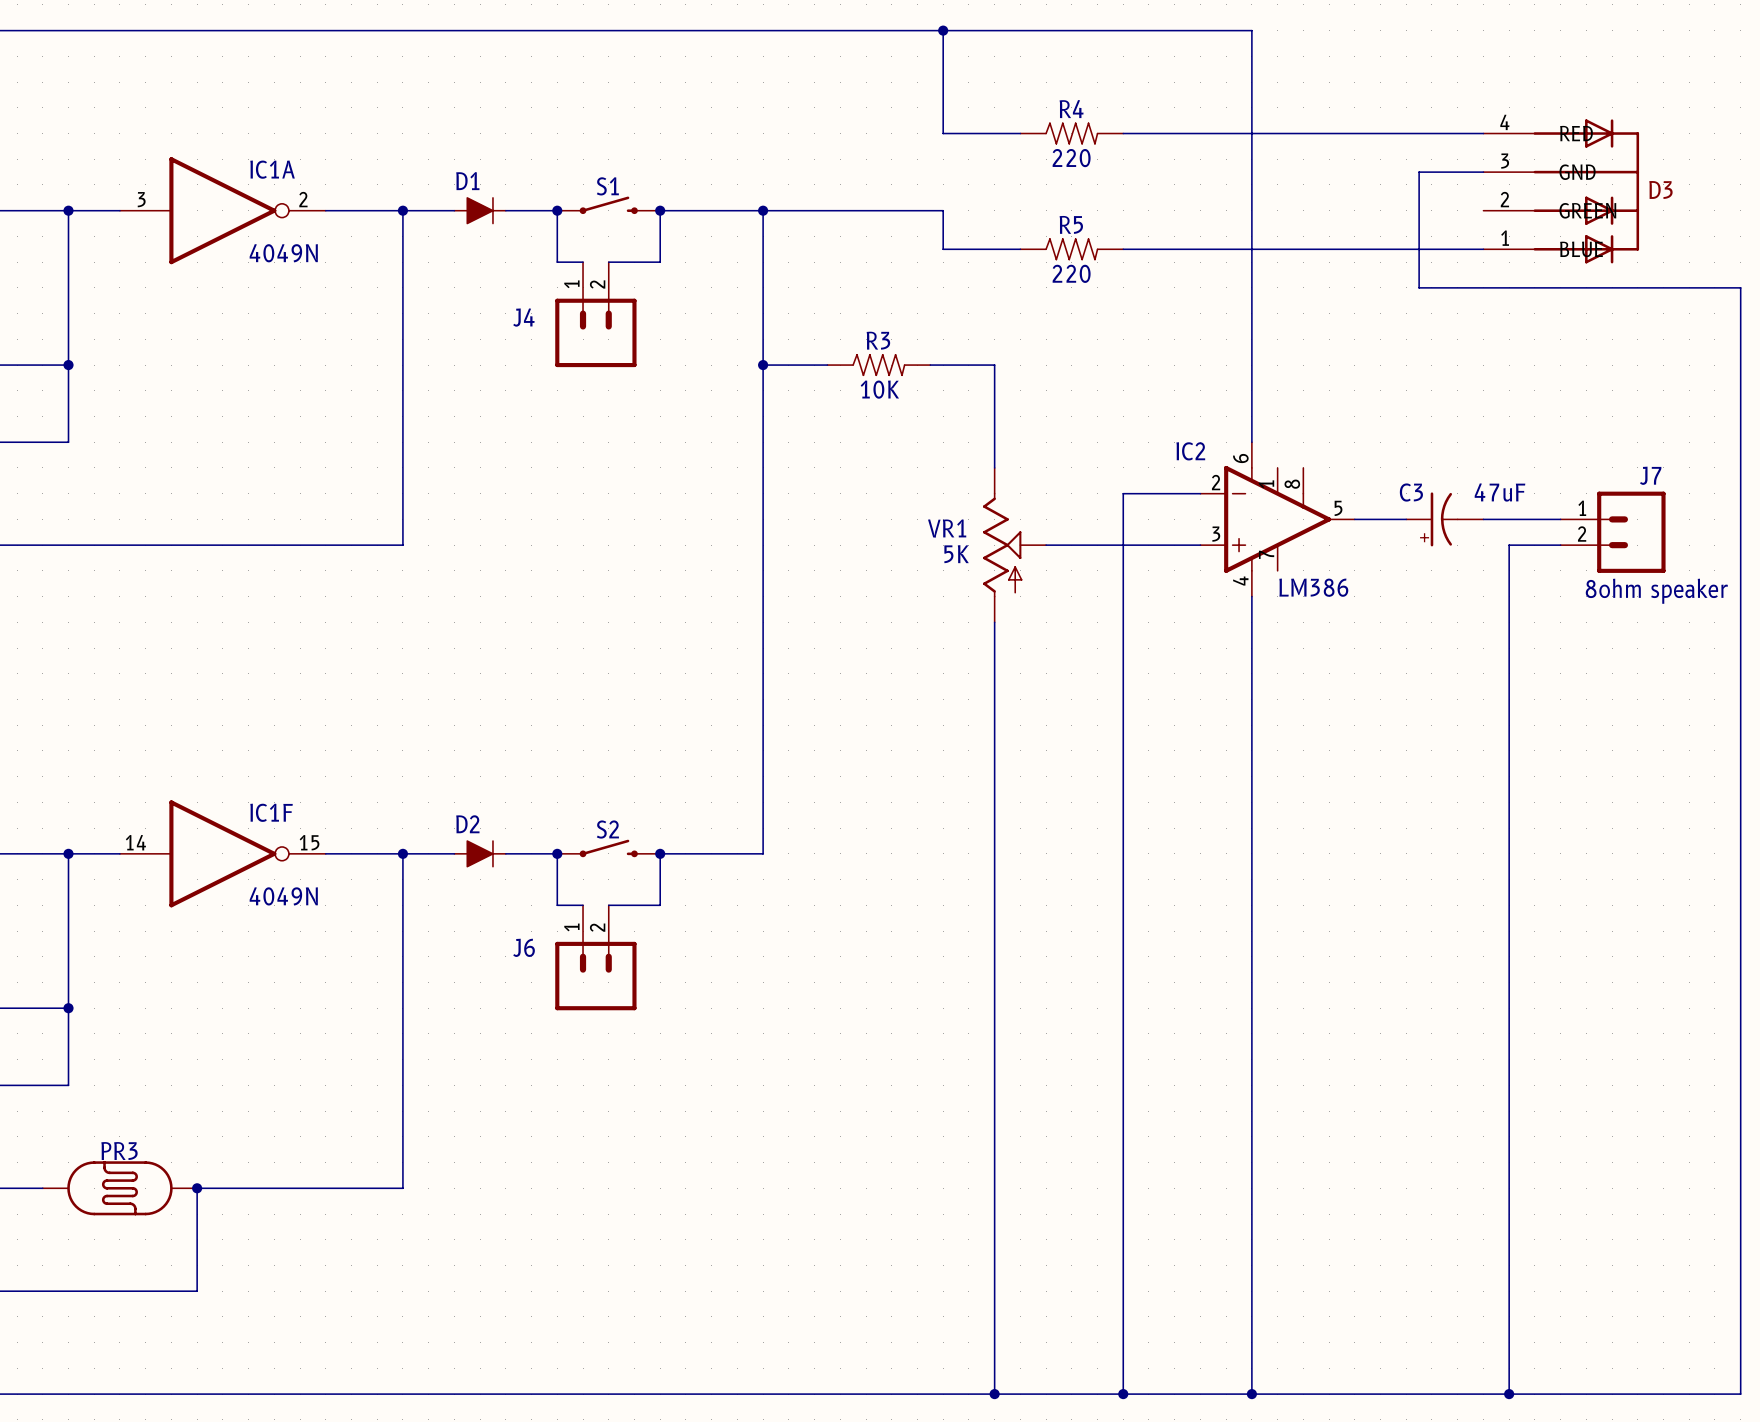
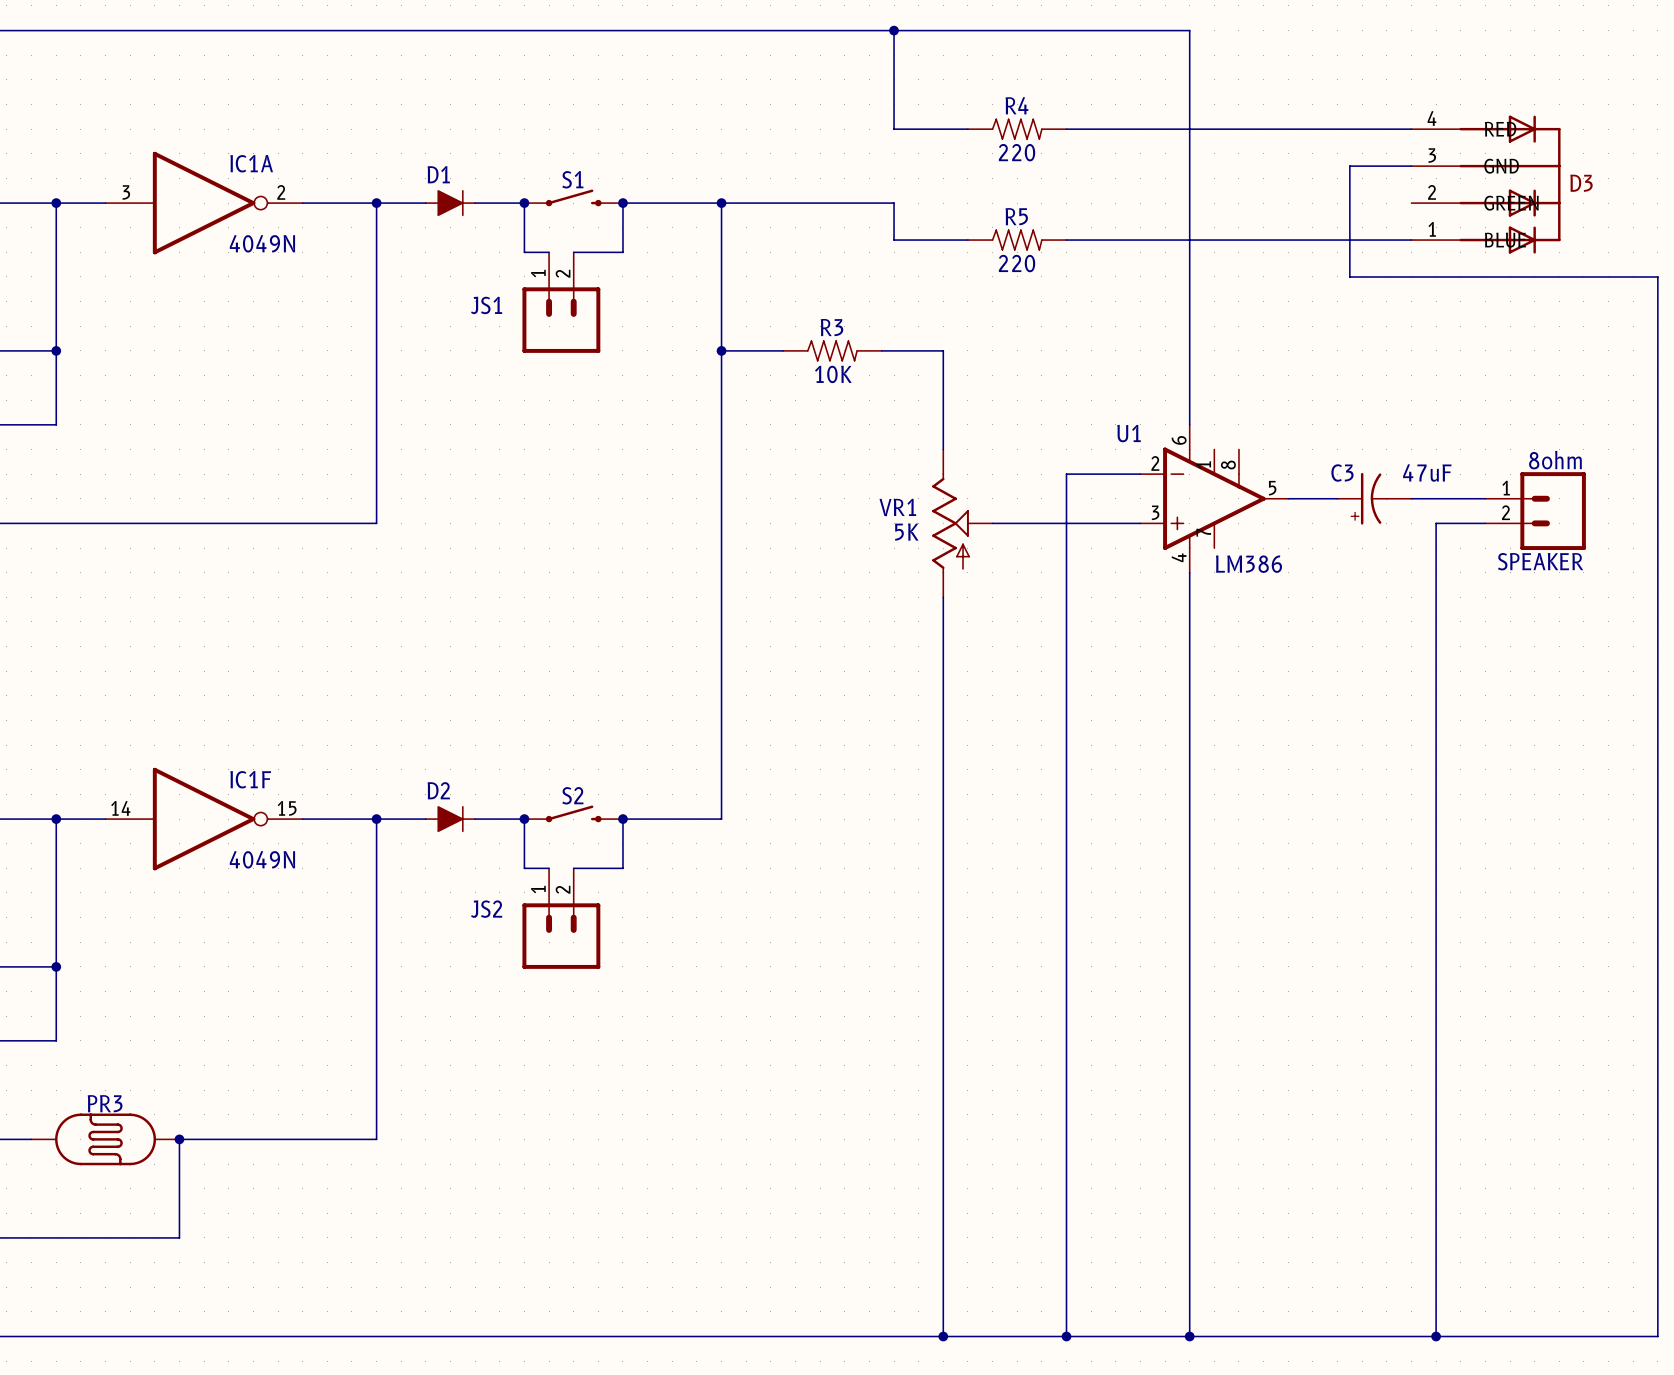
J4 name: J4 (523, 317) -> JS1 (486, 305)
IC2 name: IC2 (1190, 451) -> U1 (1129, 433)
J7 name: J7 (1650, 475) -> SPEAKER (1540, 561)
J7 value: 8ohm speaker (1656, 591) -> 8ohm (1555, 460)
J6 name: J6 (524, 947) -> JS2 (486, 909)

